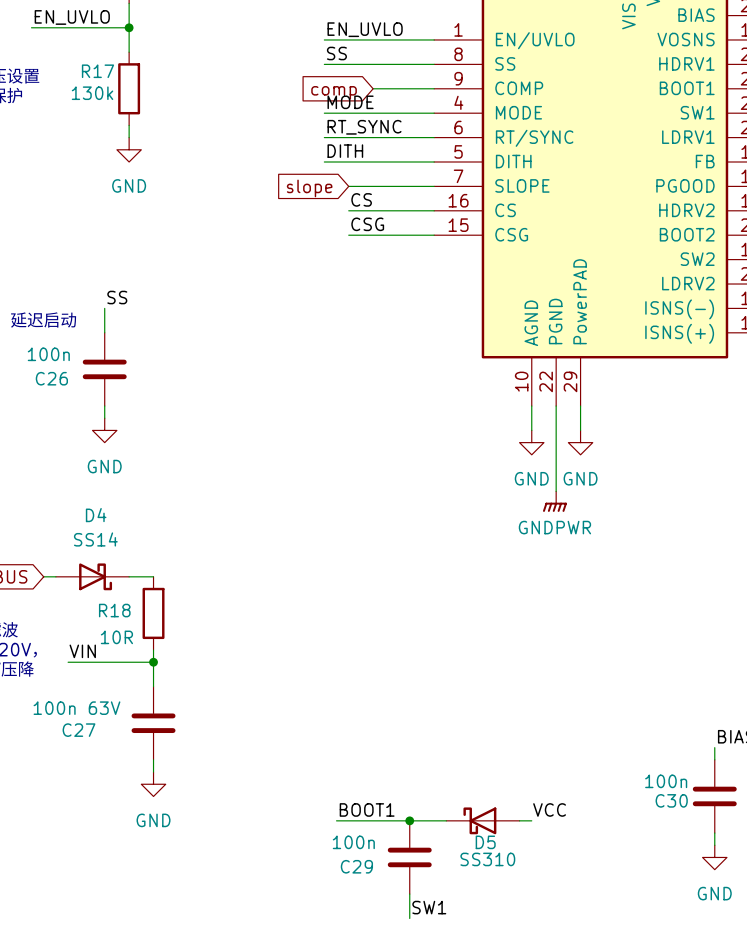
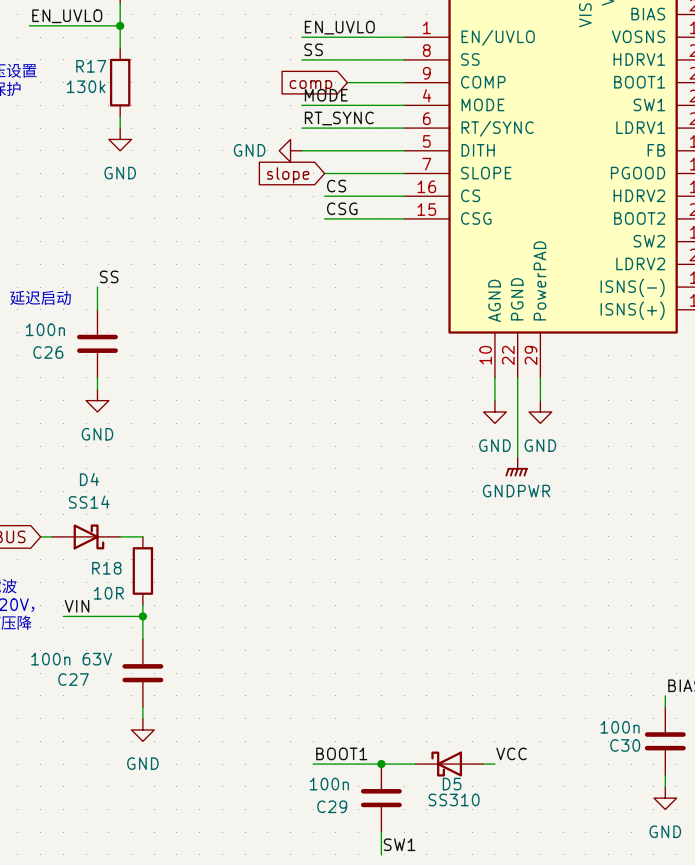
label: DITH (345, 151) -> none
power symbol: none -> GND (290, 150)

